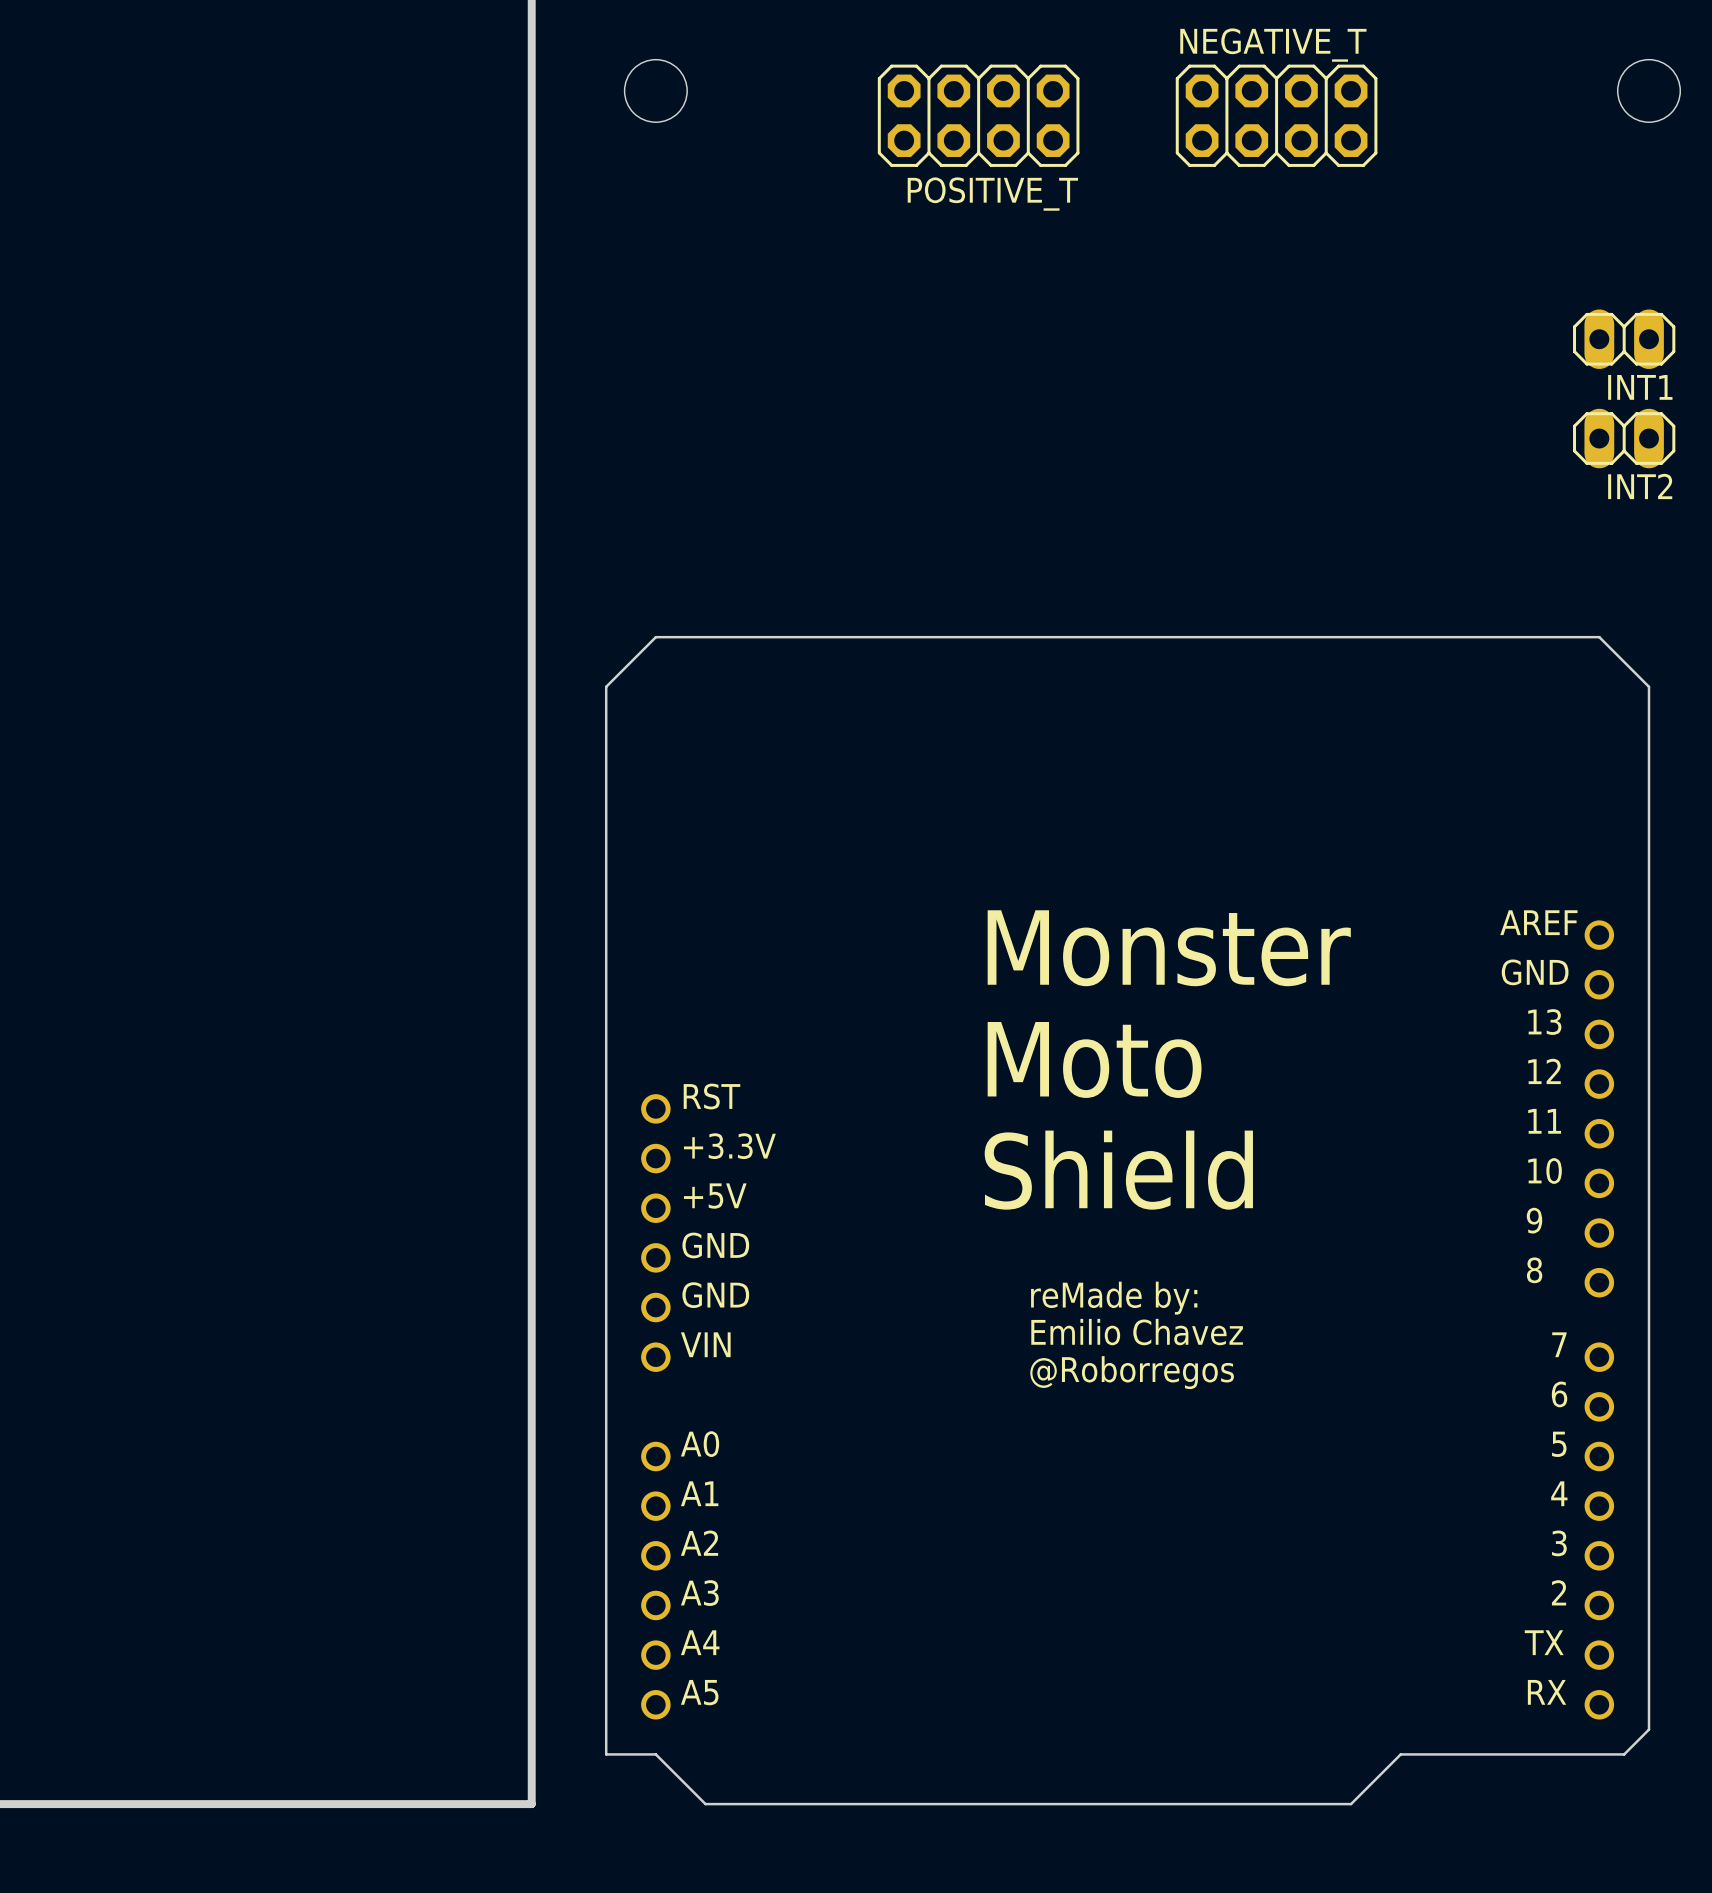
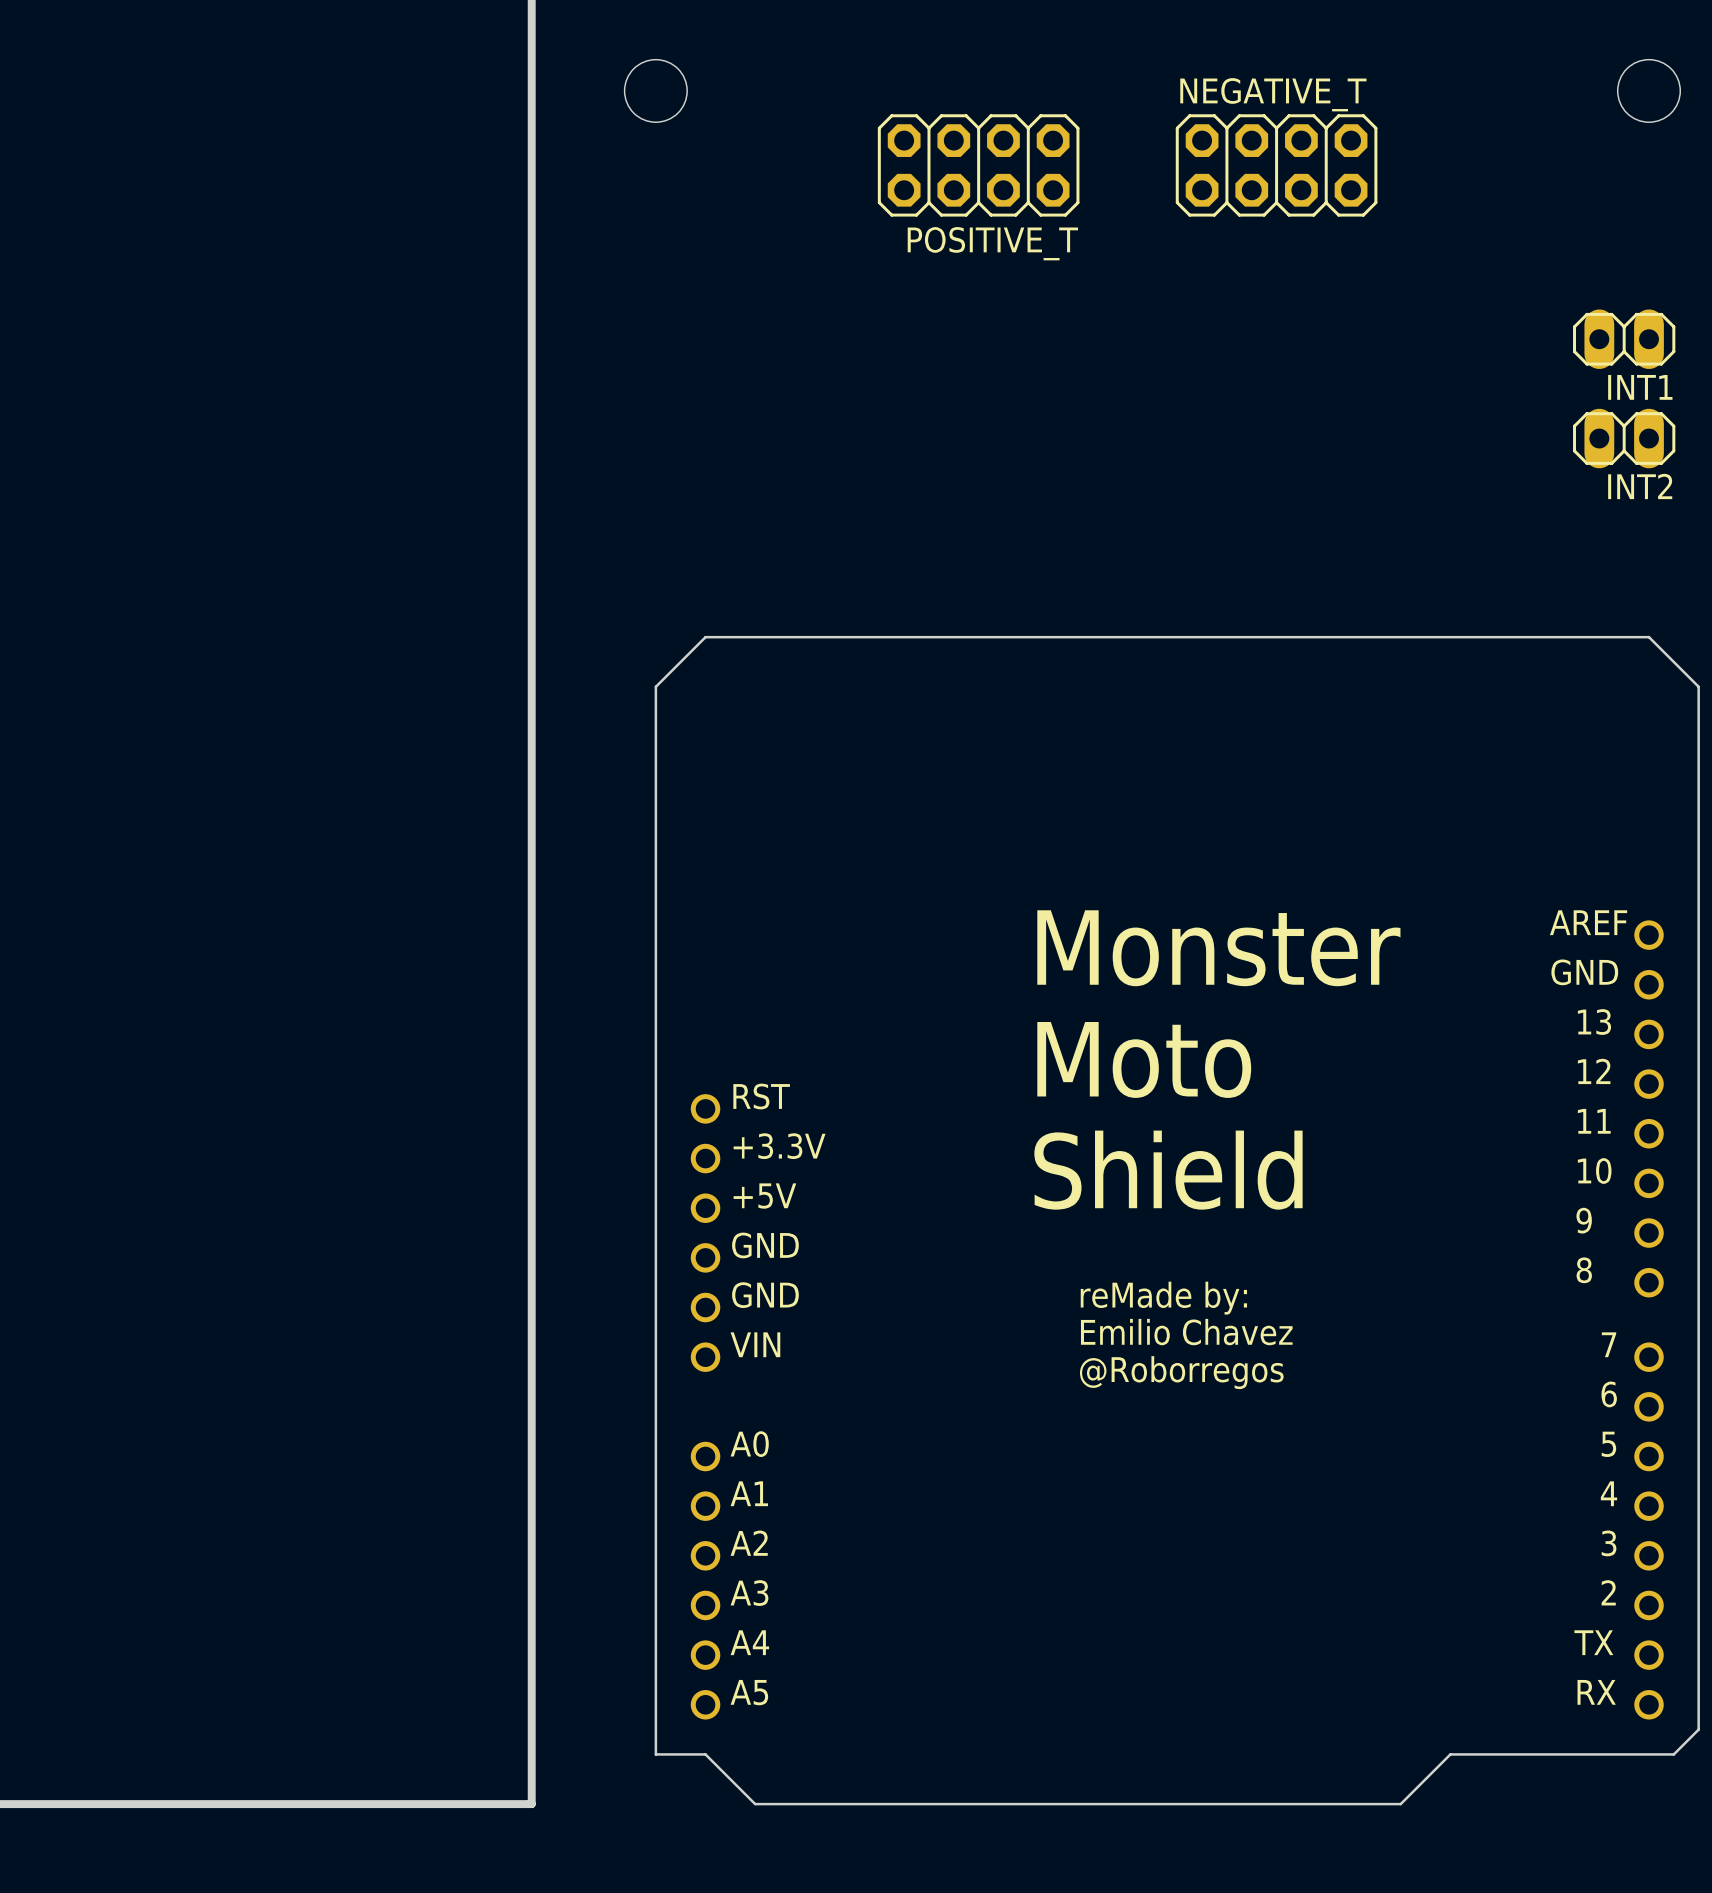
POSITIVE_T position: (978, 115) -> (978, 165)
NEGATIVE_T position: (1276, 115) -> (1276, 165)
part position: (1127, 1220) -> (1177, 1220)

